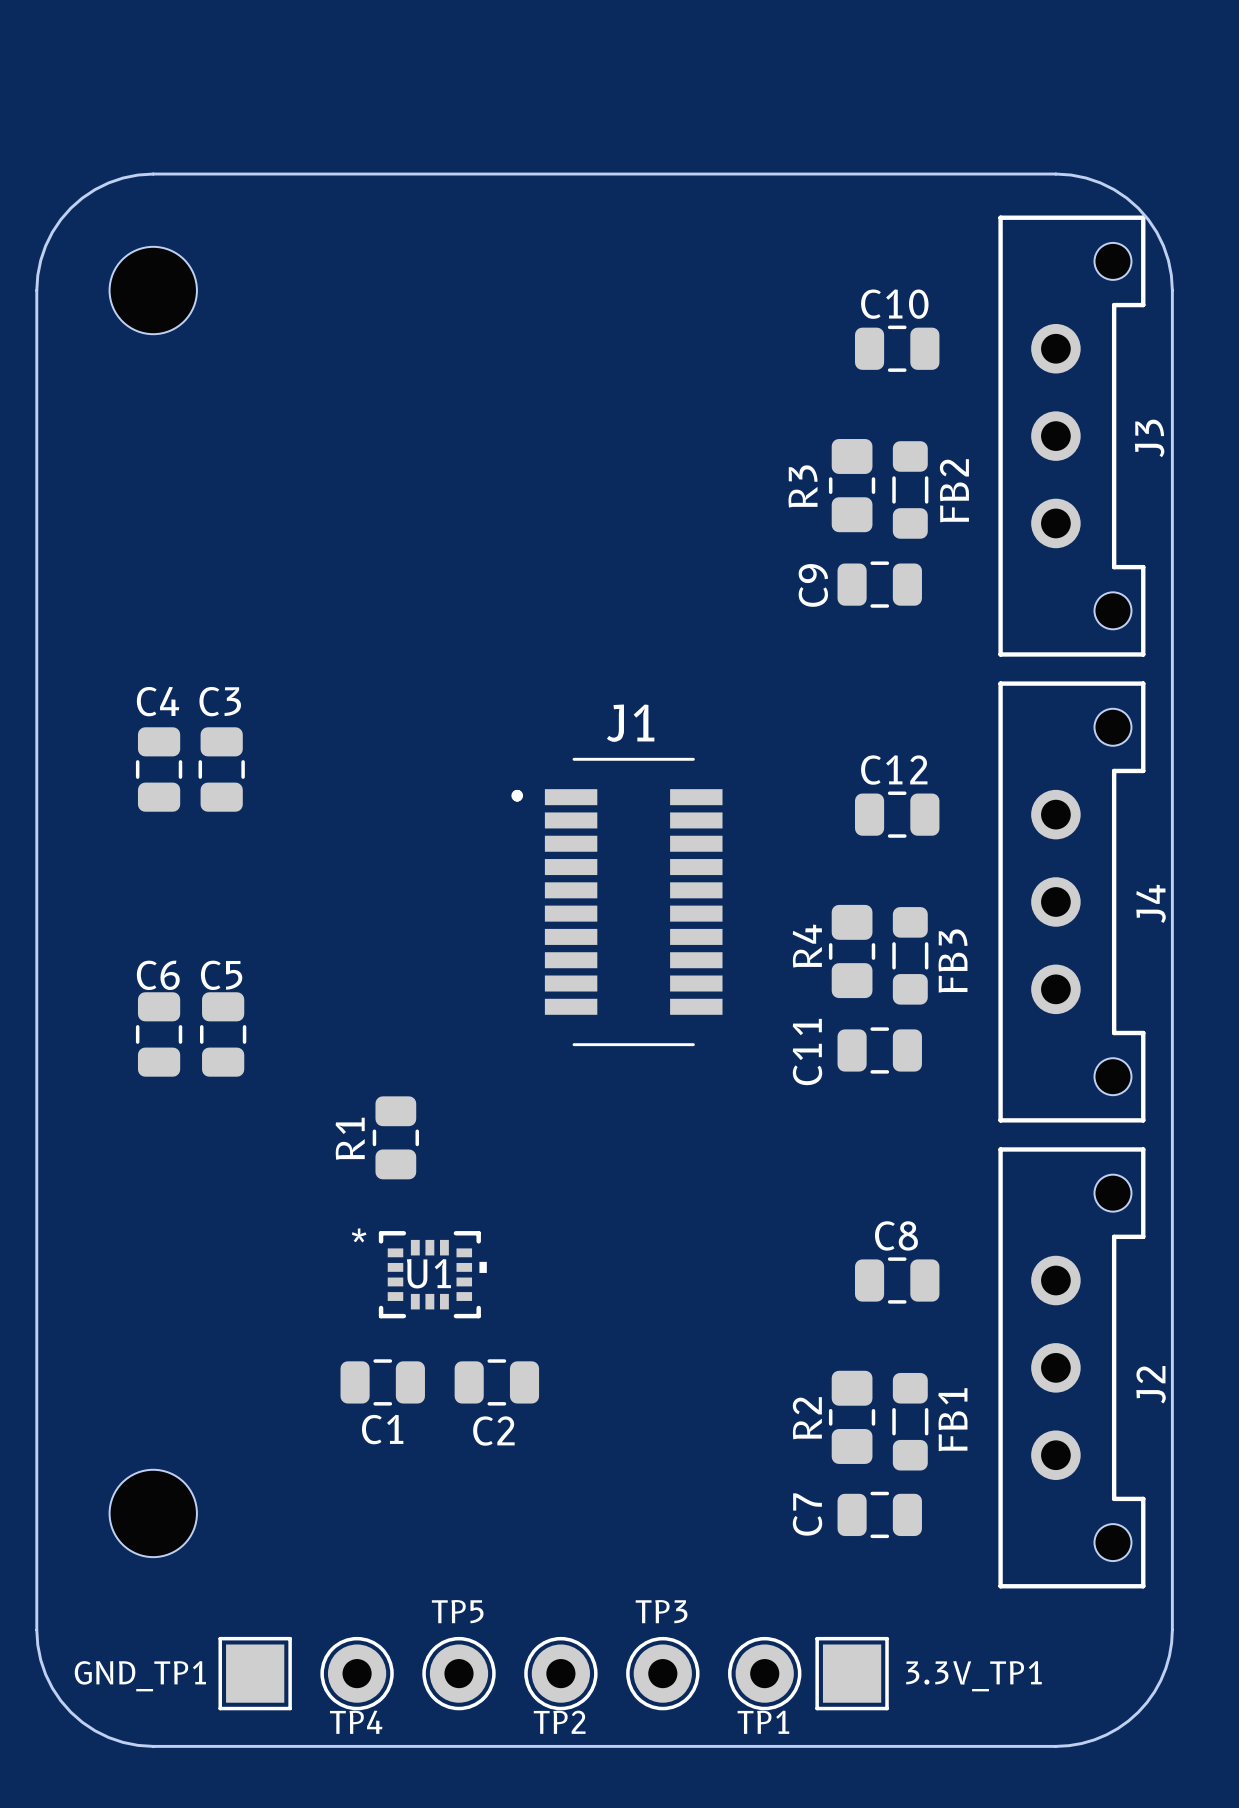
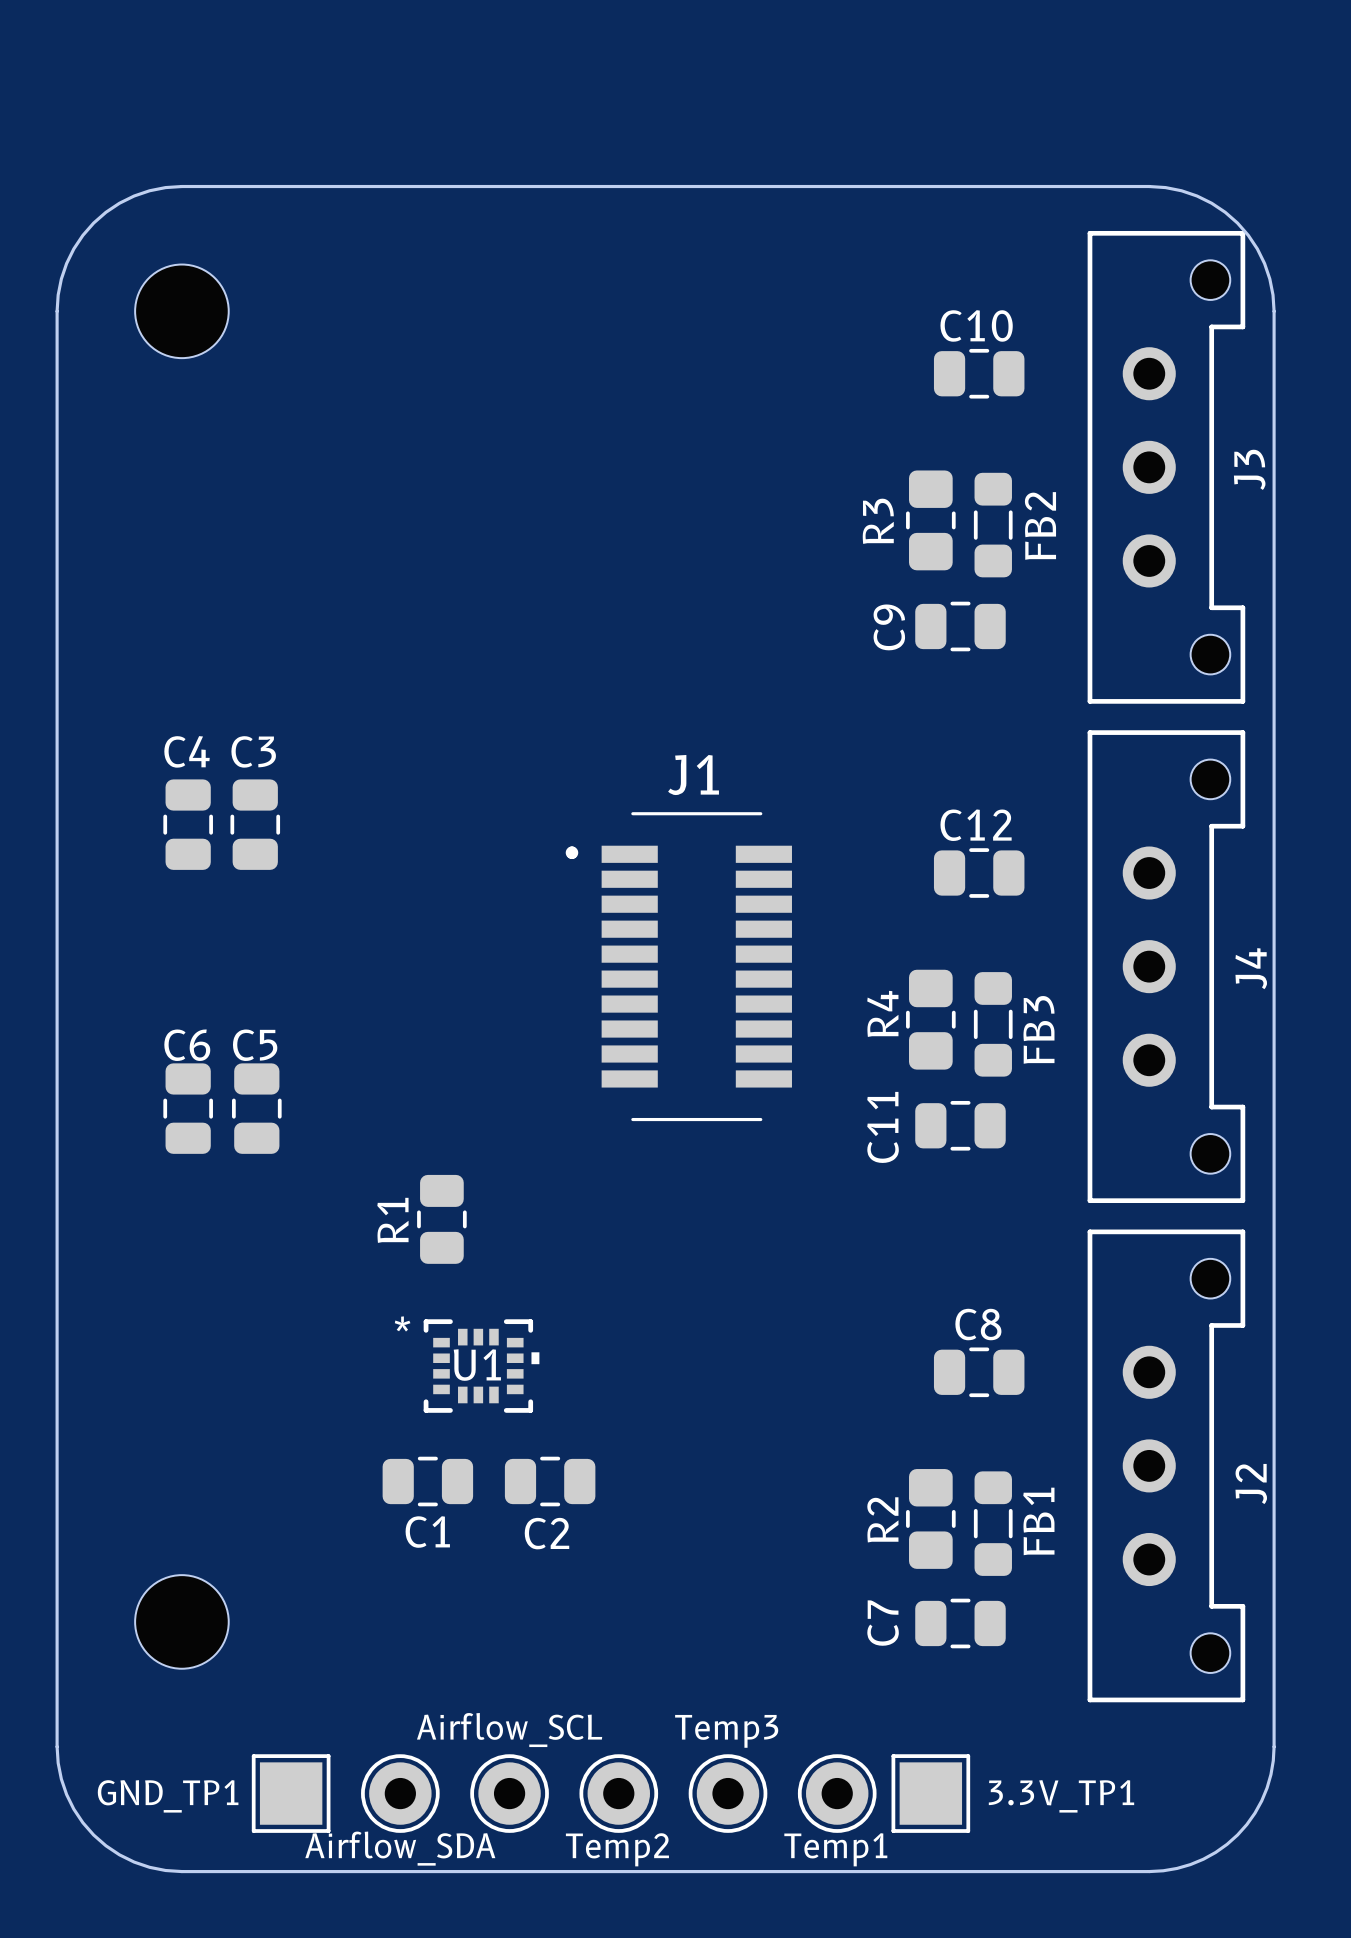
TP5 name: TP5 (457, 1611) -> Airflow_SCL (509, 1730)
TP3 name: TP3 (661, 1611) -> Temp3 (726, 1731)
TP4 name: TP4 (356, 1722) -> Airflow_SDA (400, 1848)
TP2 name: TP2 (559, 1722) -> Temp2 (617, 1849)
TP1 name: TP1 (763, 1722) -> Temp1 (835, 1849)

